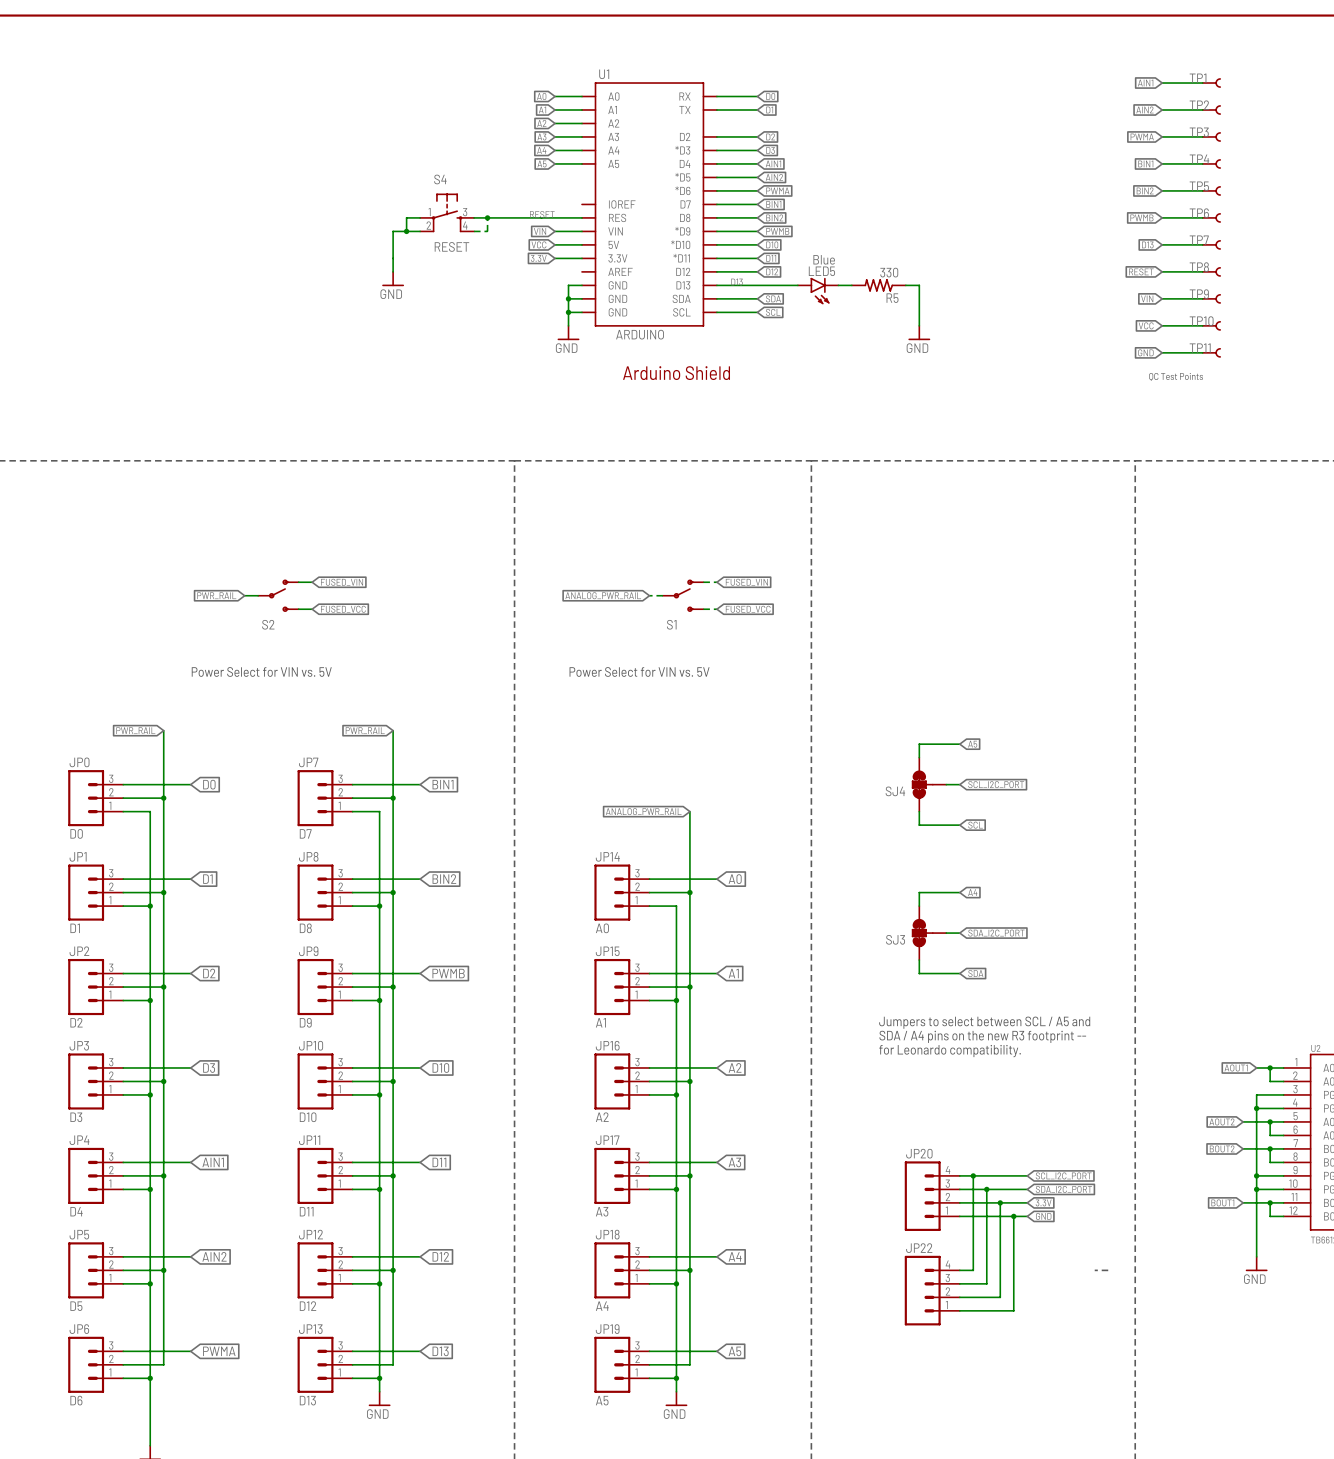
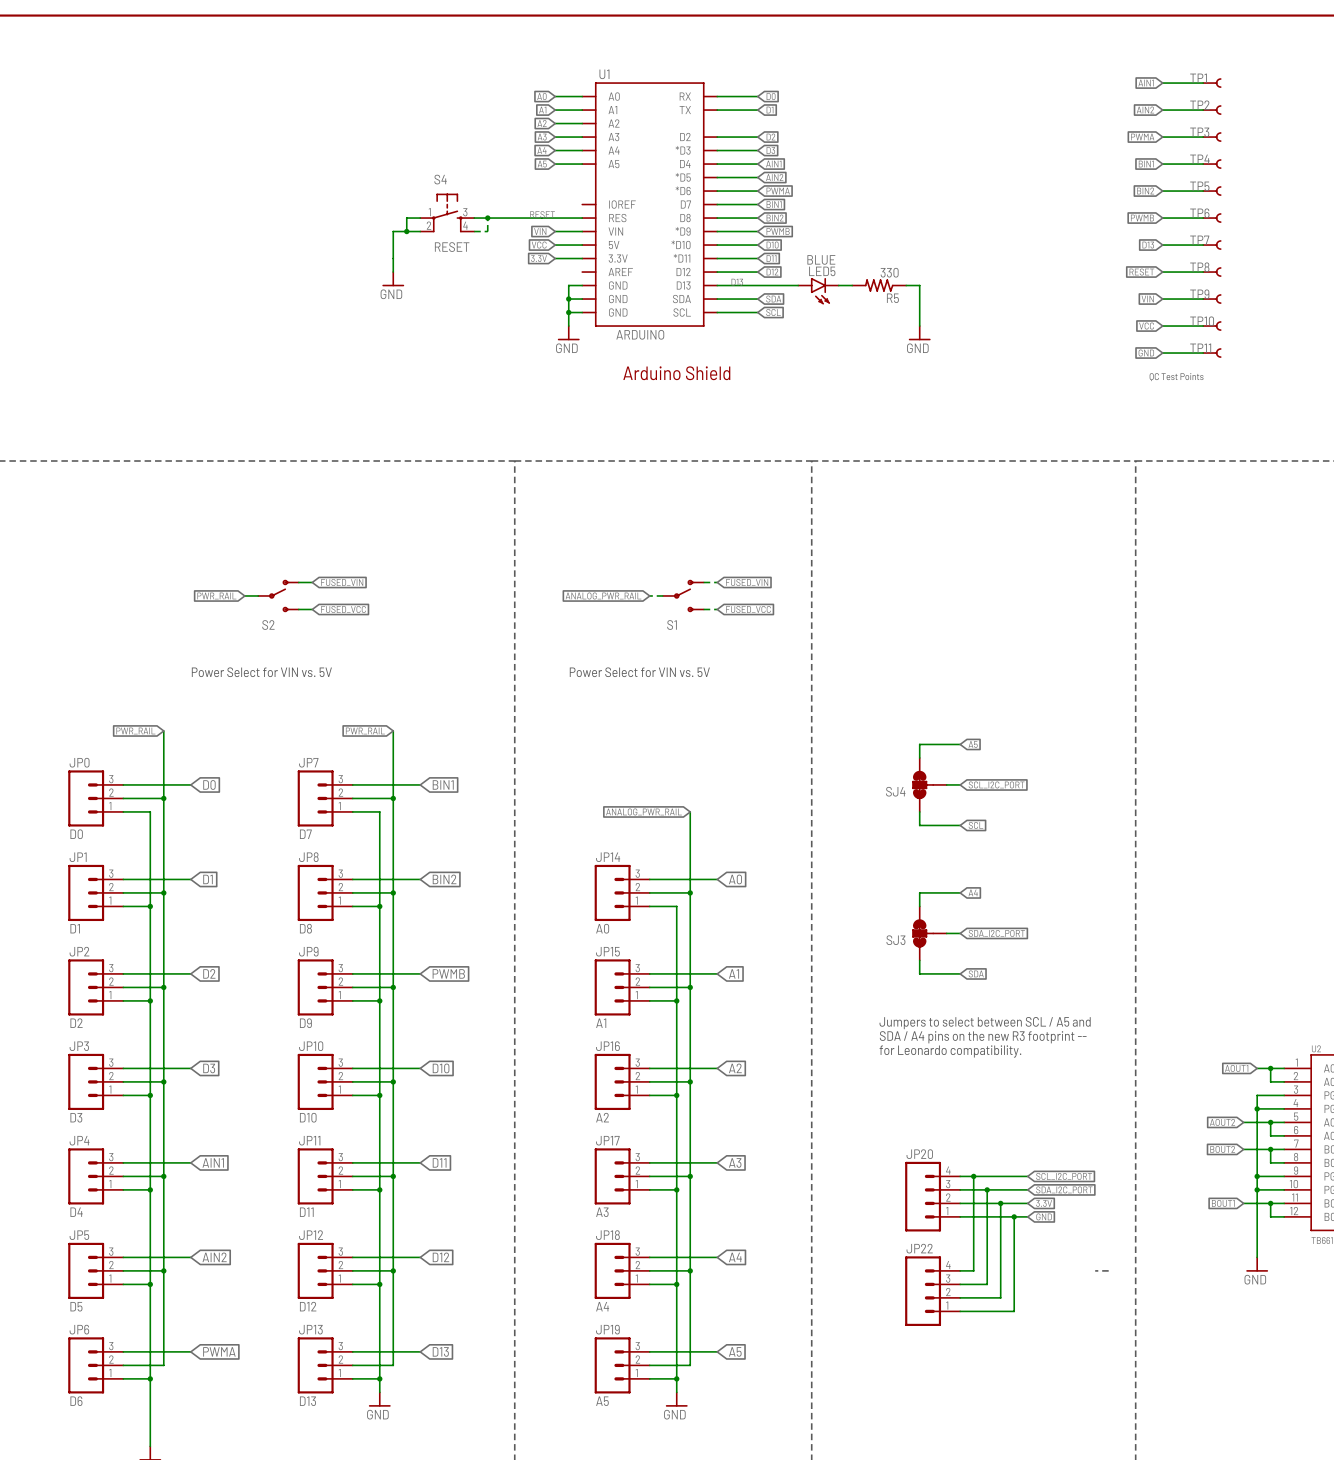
LED5 value: Blue (824, 259) -> BLUE (821, 259)

